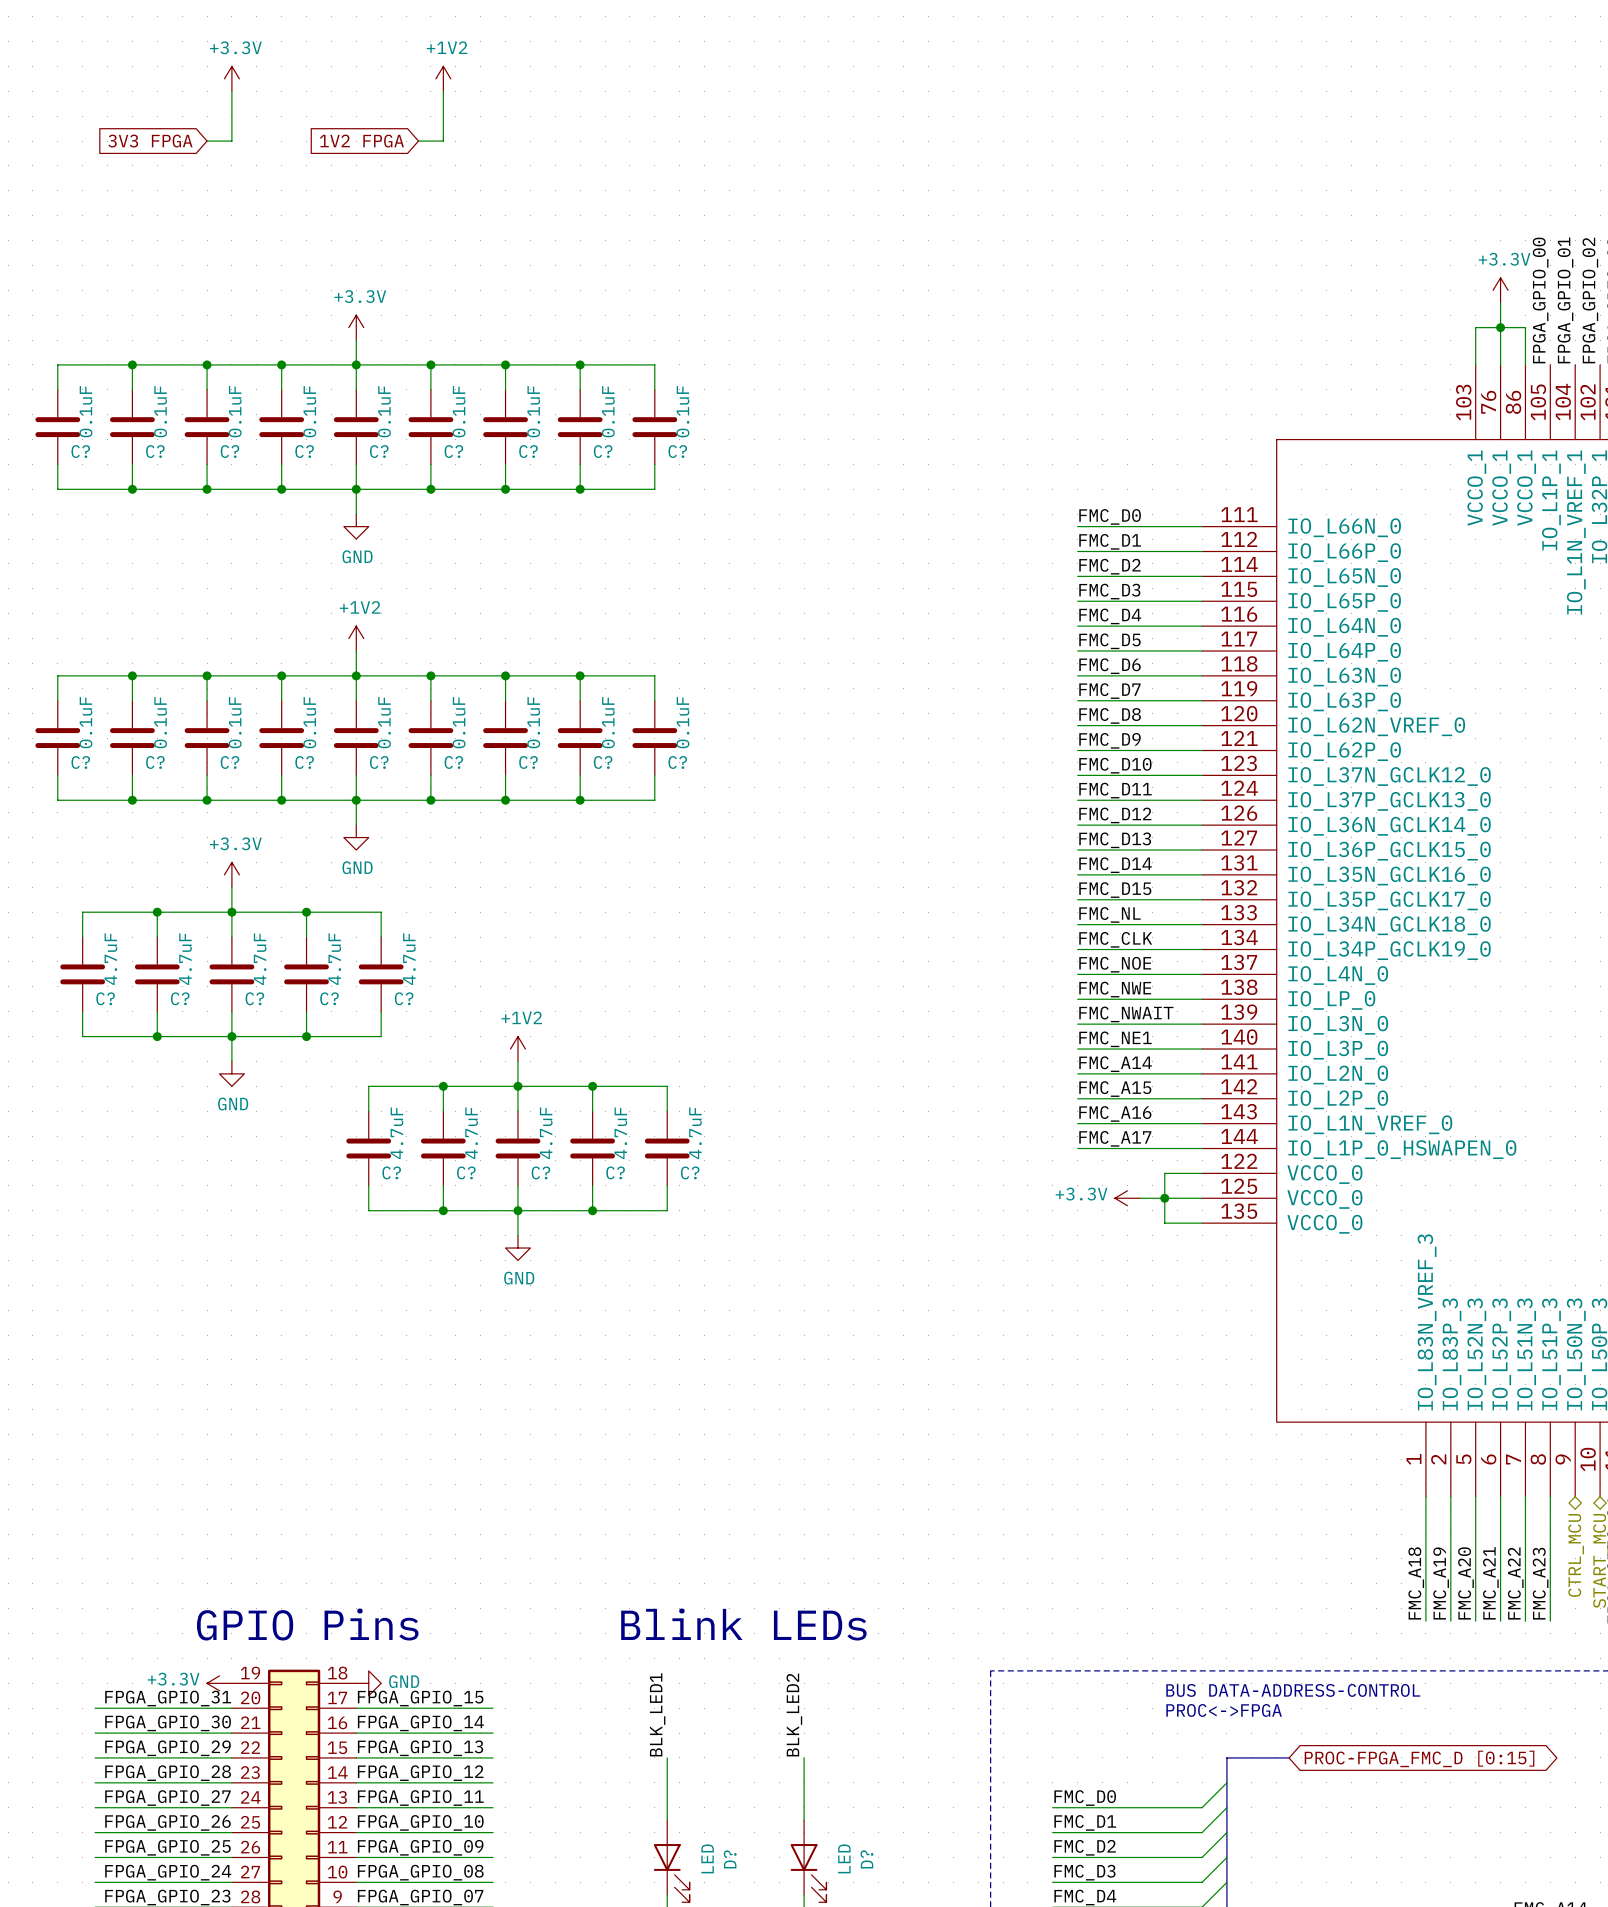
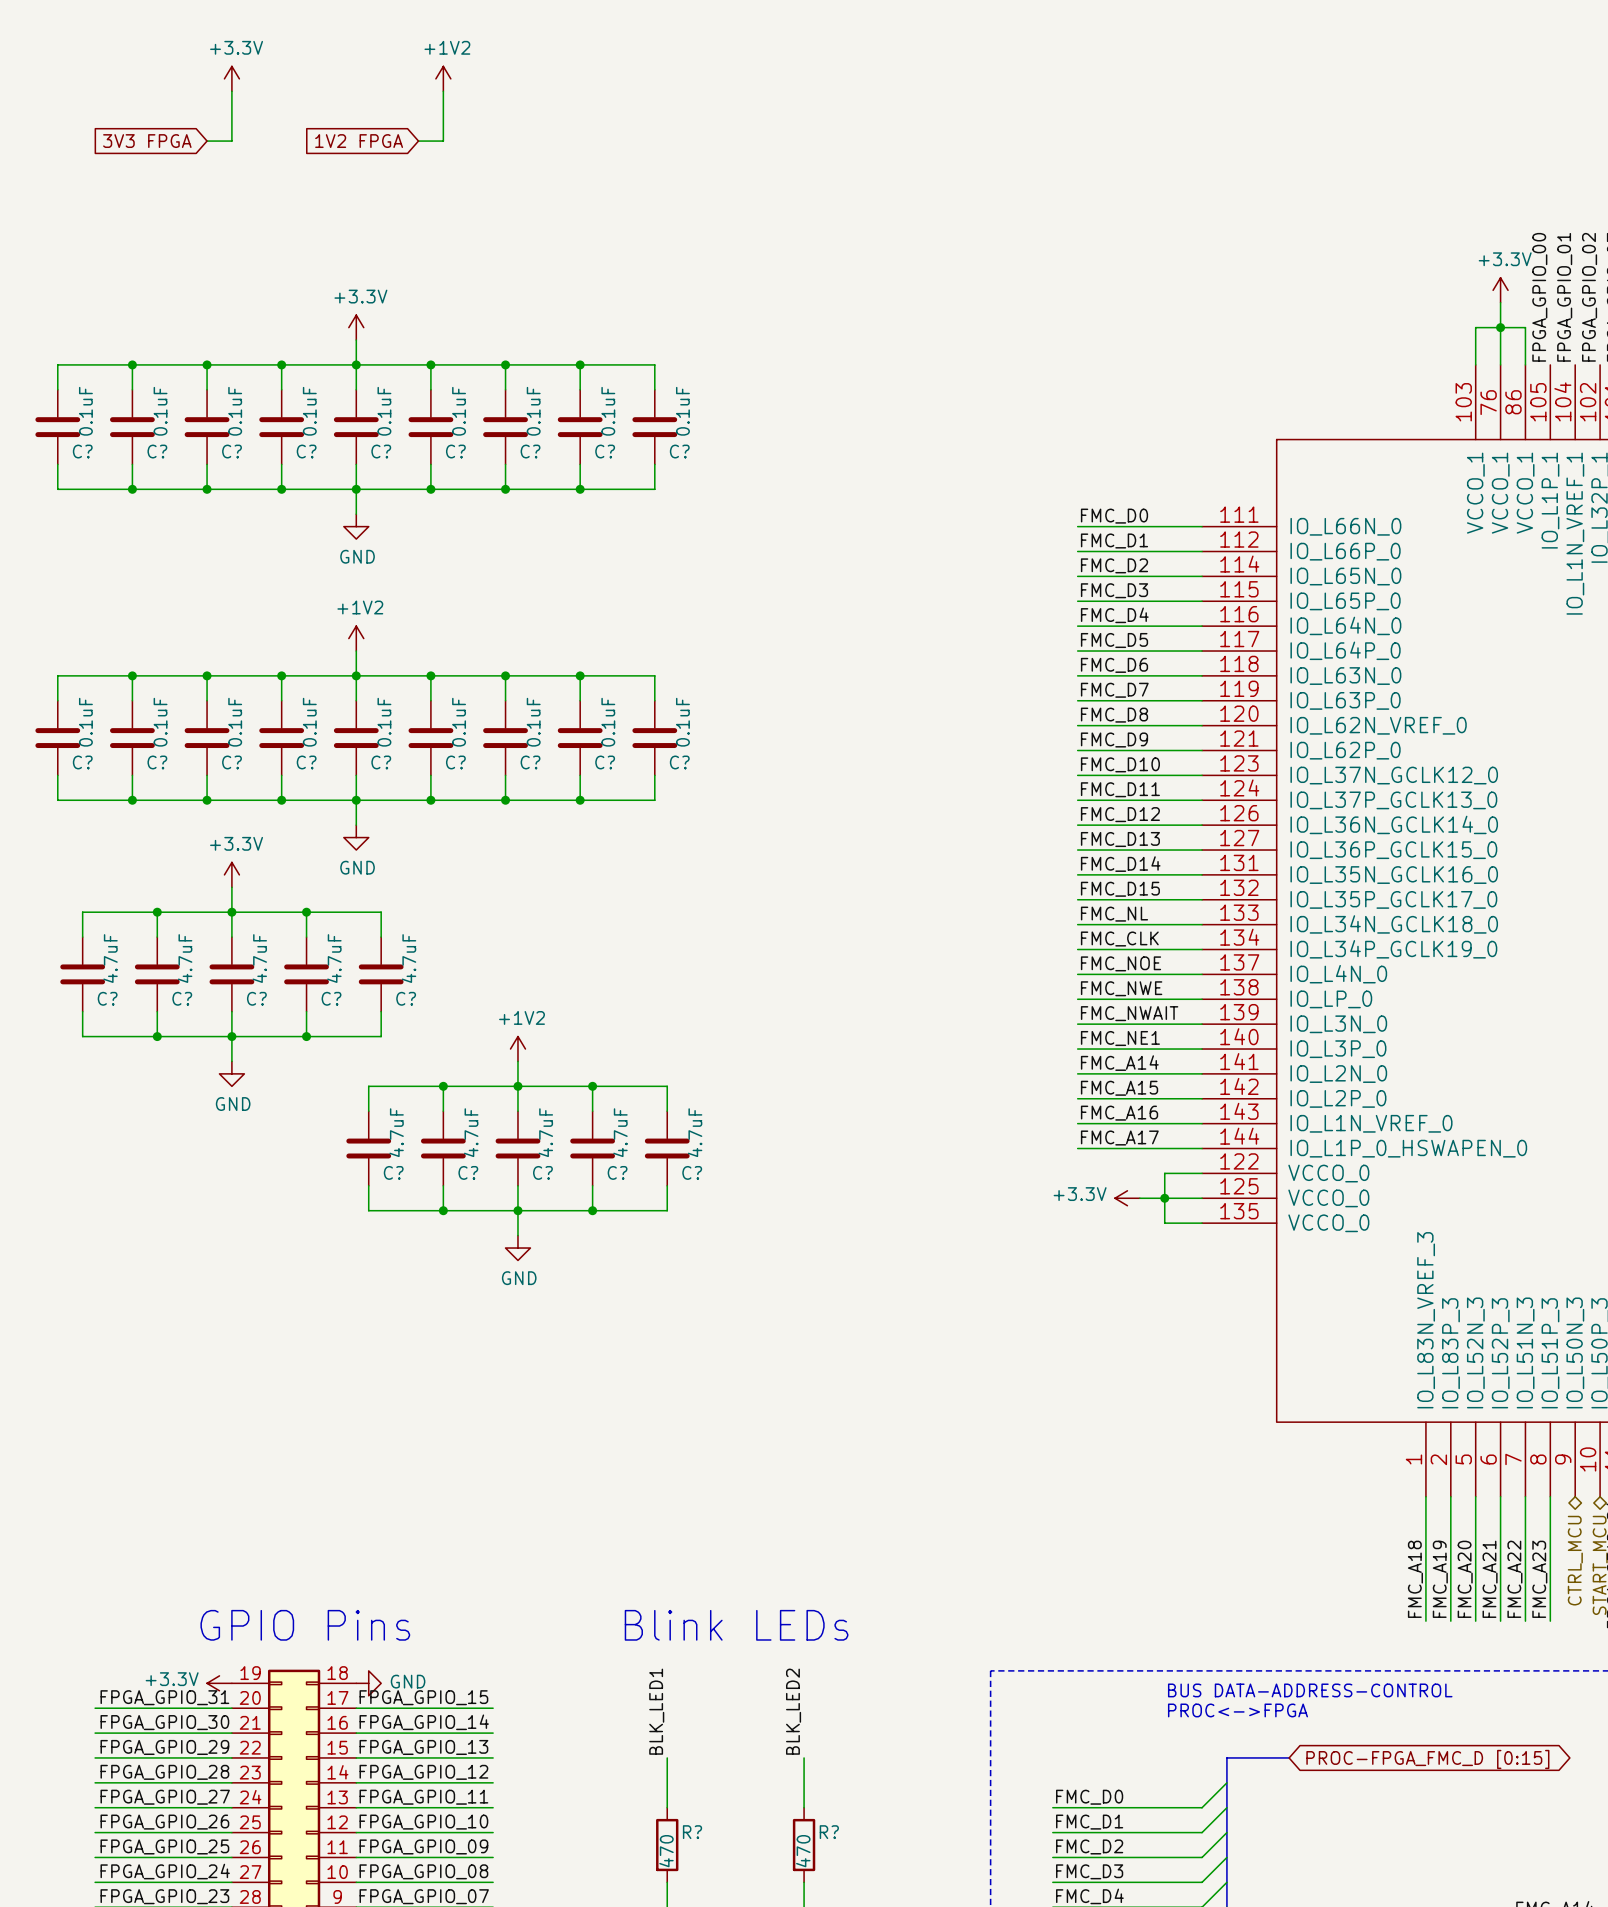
R?: none -> 470 (667, 1845)
R?: none -> 470 (804, 1845)
D?: LED (671, 1861) -> none
D?: LED (808, 1861) -> none

